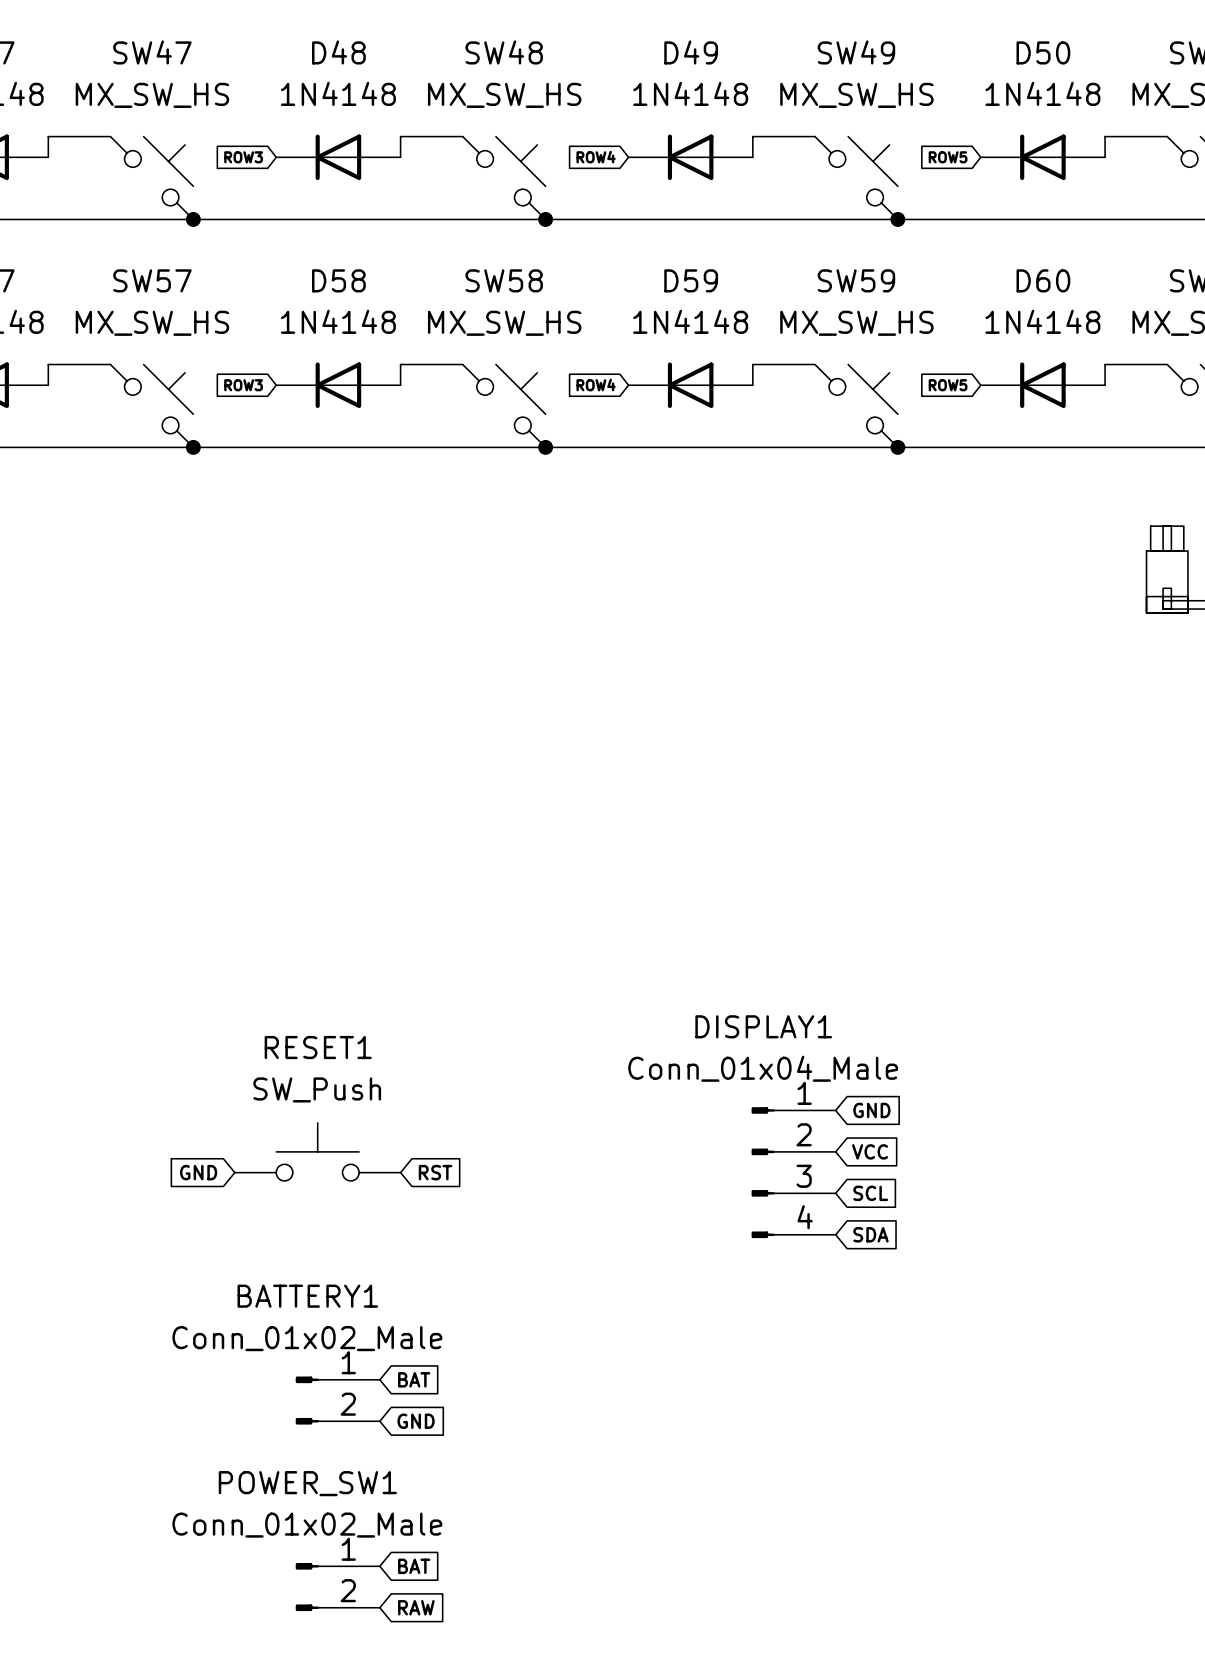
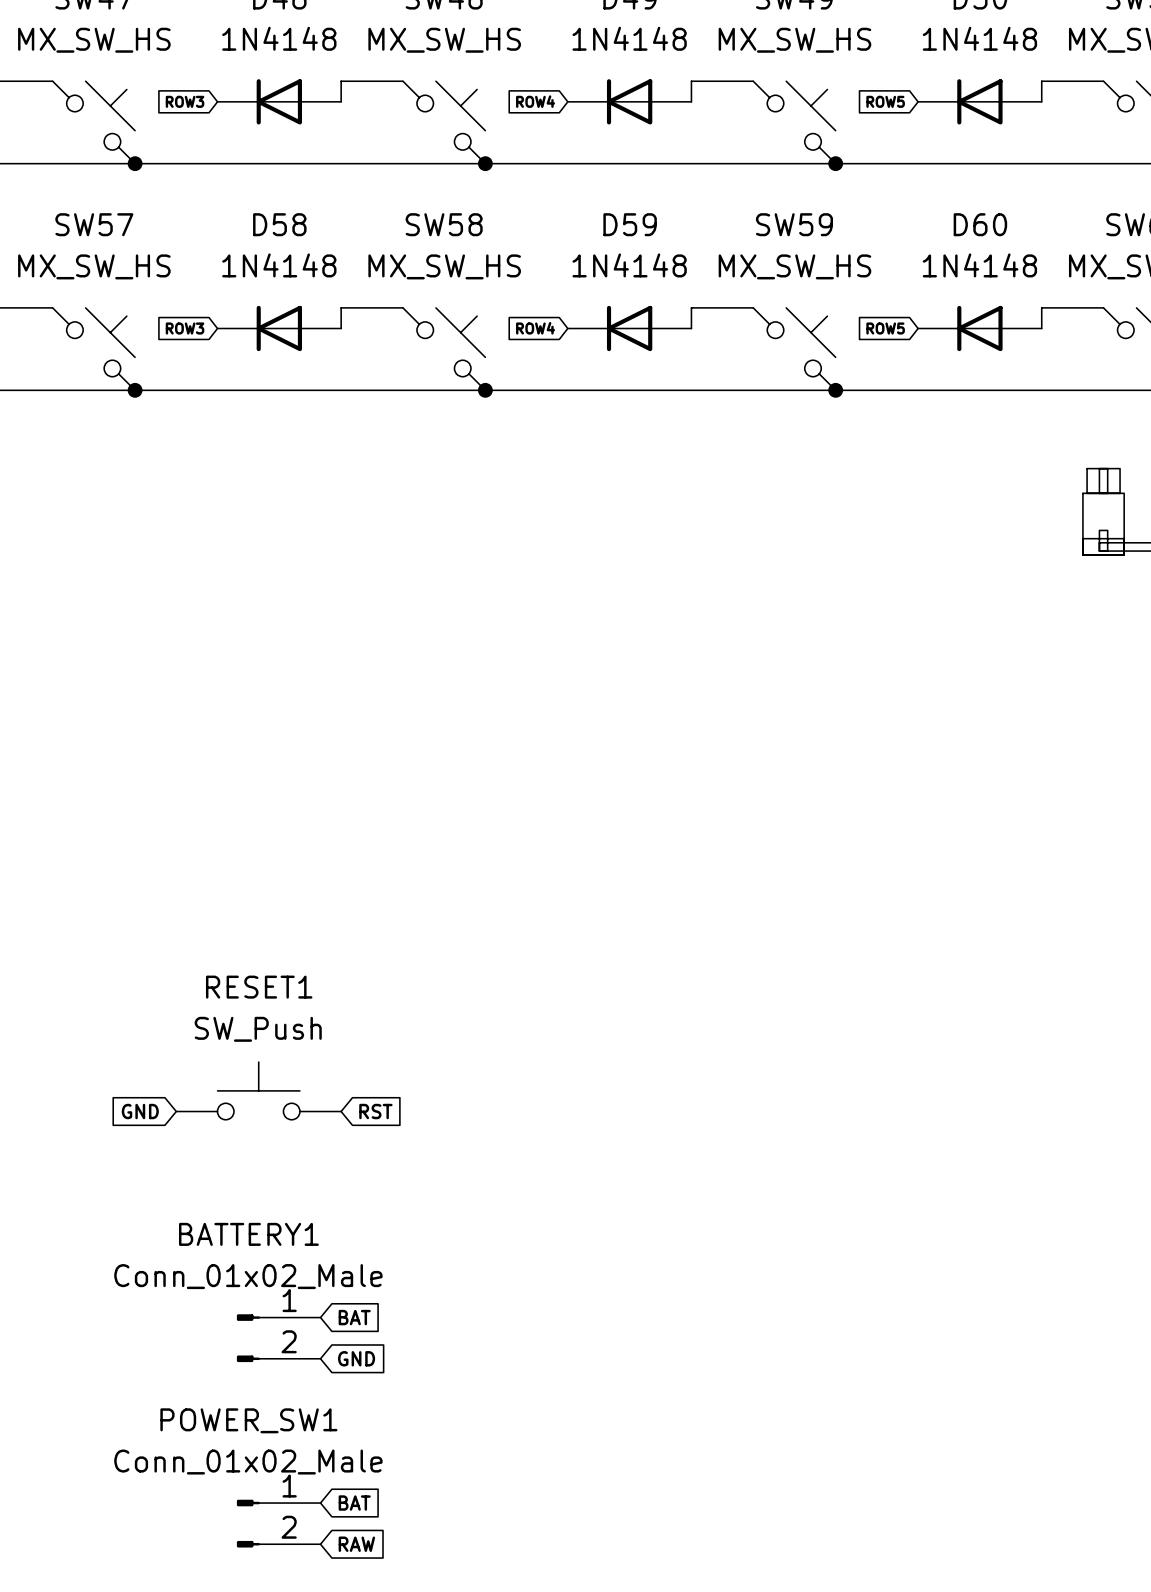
global label: GND (871, 1110) -> none
global label: VCC (870, 1151) -> none
DISPLAY1: Conn_01x04_Male (793, 1172) -> none
global label: SCL (870, 1193) -> none
global label: SDA (870, 1234) -> none

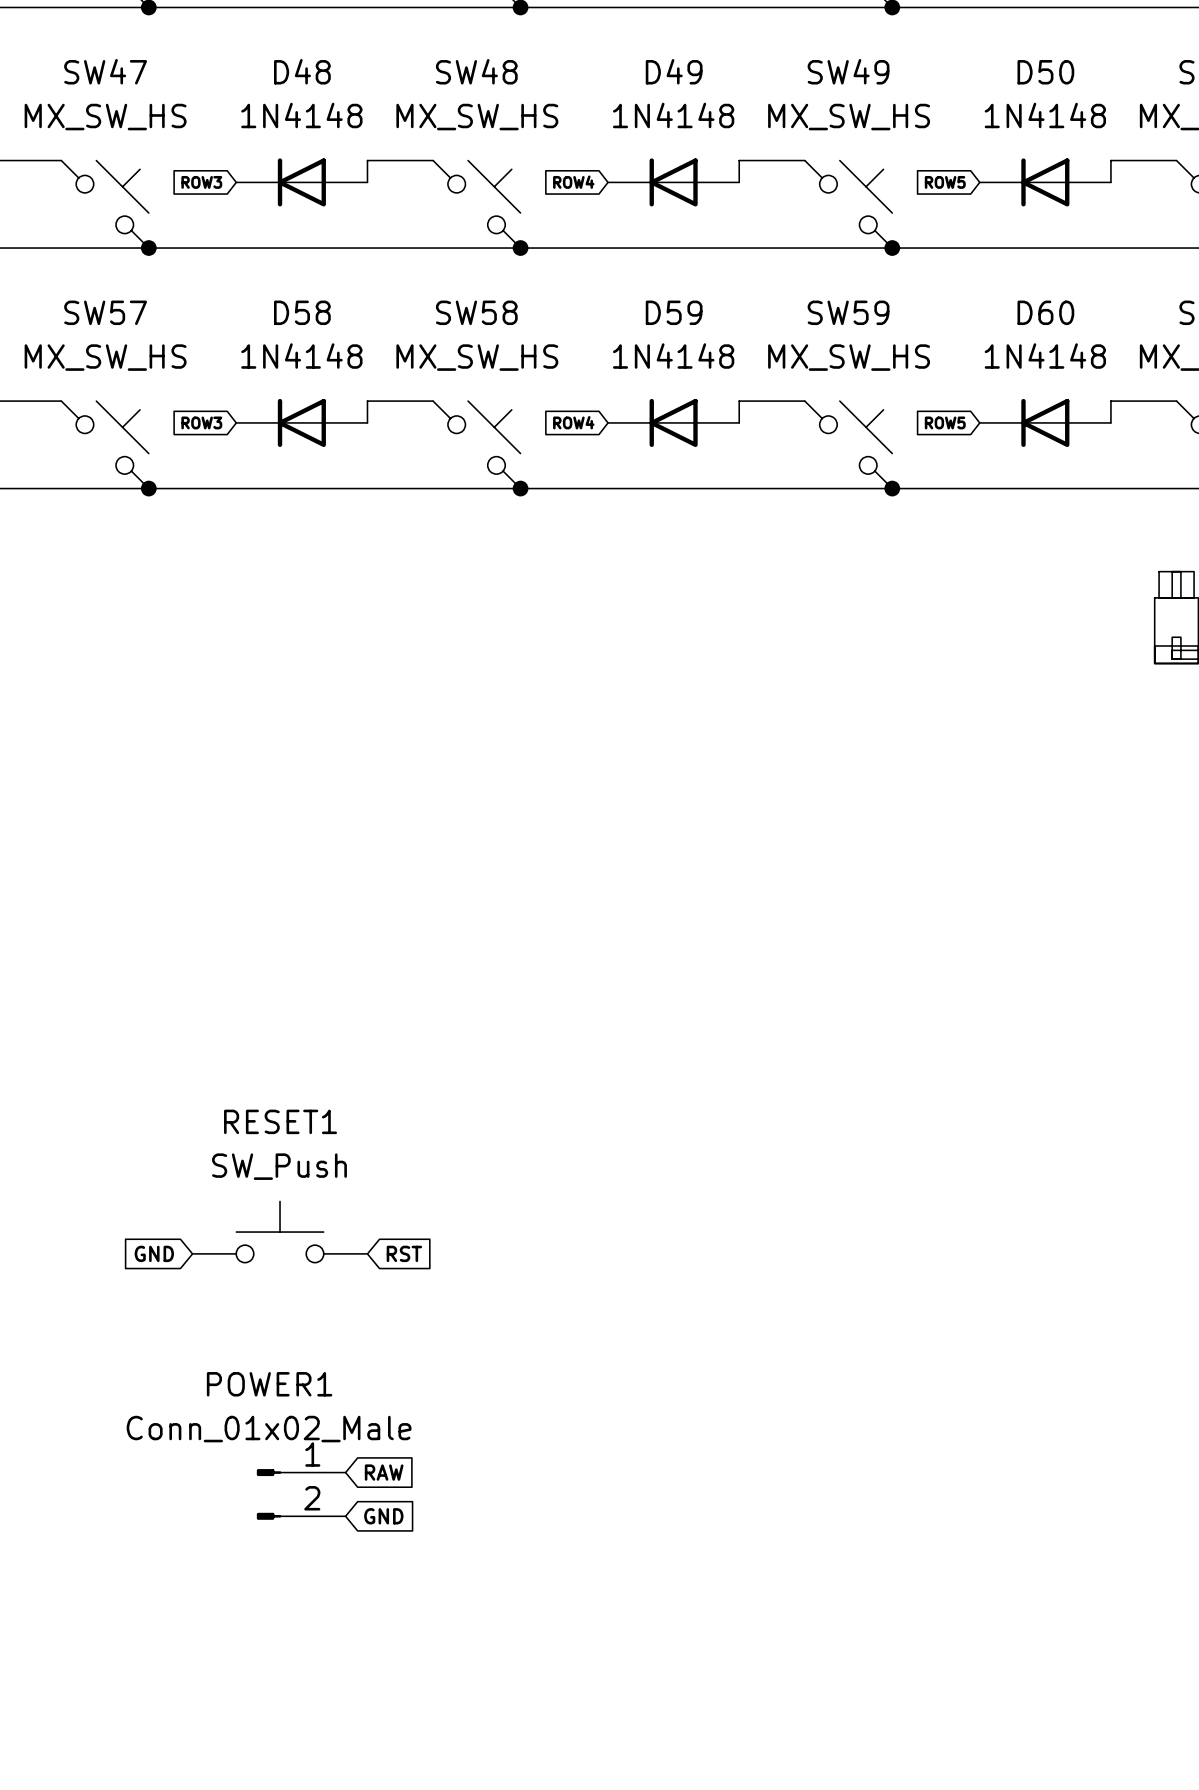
BATTERY1 name: BATTERY1 (248, 1234) -> POWER1 (269, 1384)
global label: BAT (354, 1317) -> RAW (384, 1472)
global label: BAT (354, 1503) -> none
POWER_SW1: Conn_01x02_Male (278, 1523) -> none
global label: RAW (356, 1544) -> none

